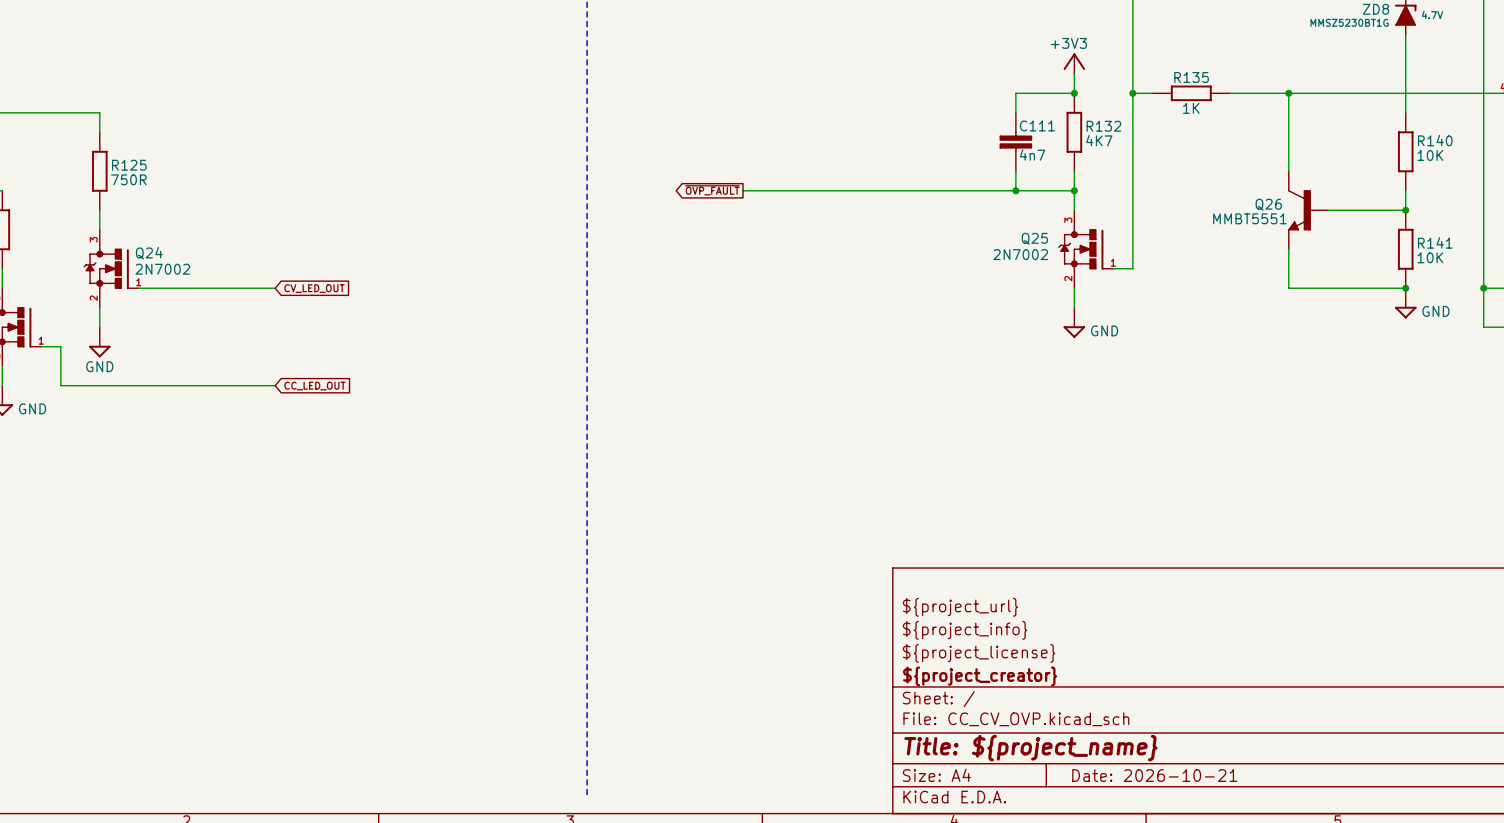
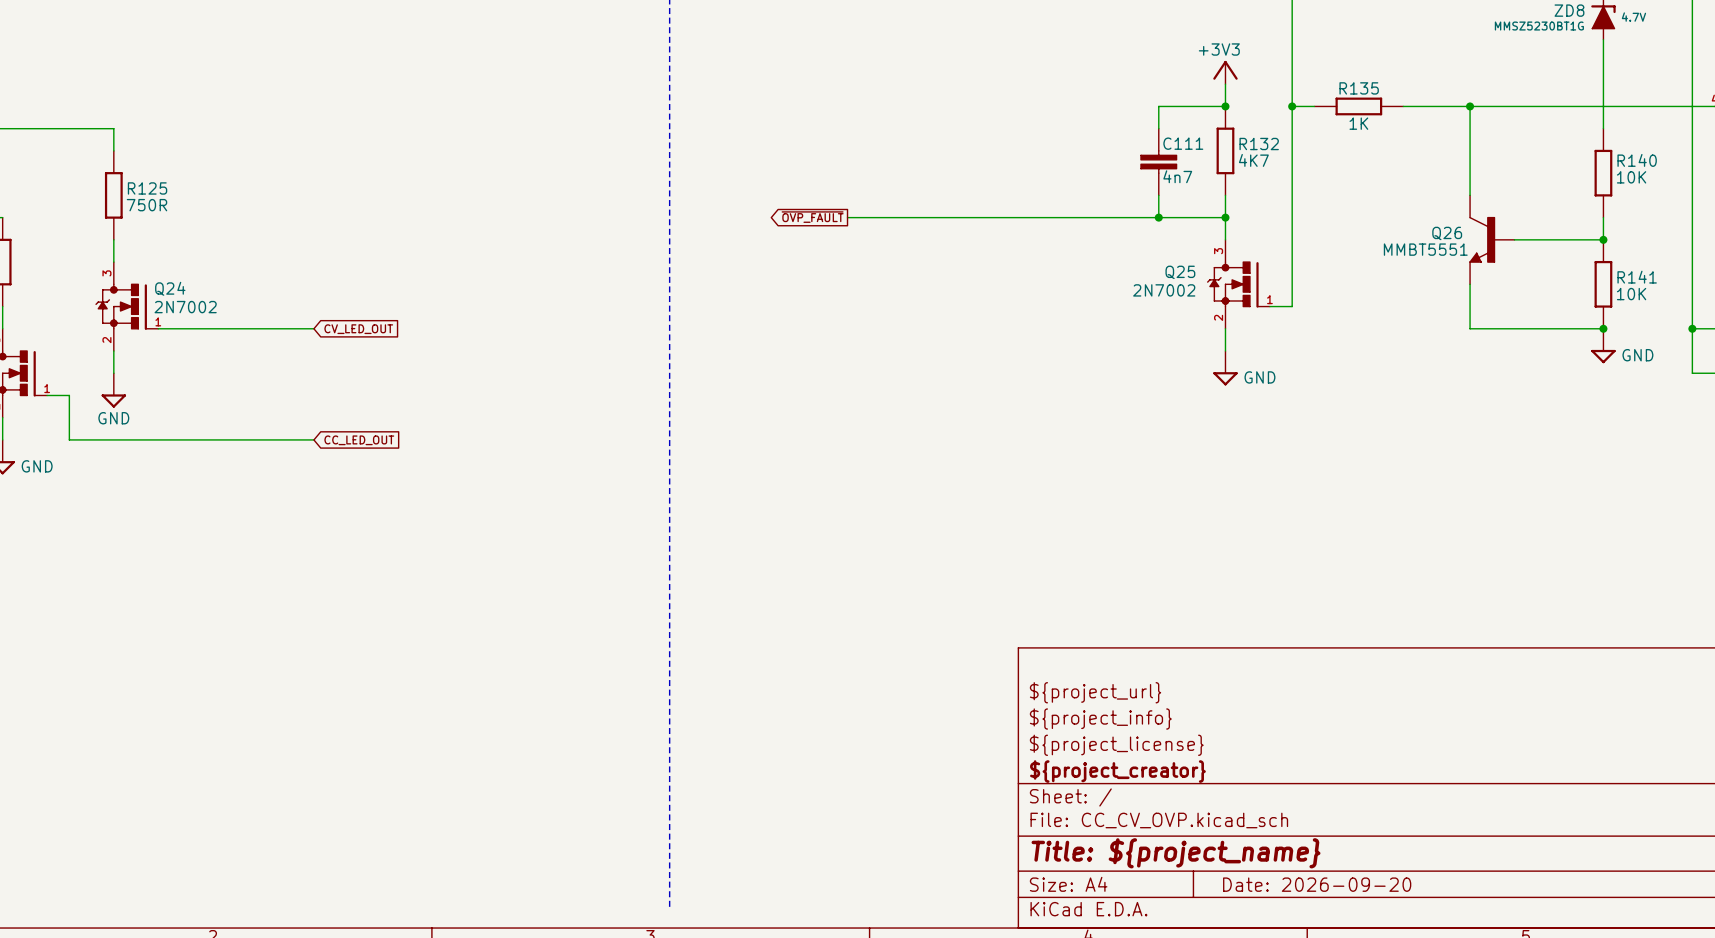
title block: Date: 2026-10-21 (1154, 775) -> Date: 2026-09-20 (1317, 884)

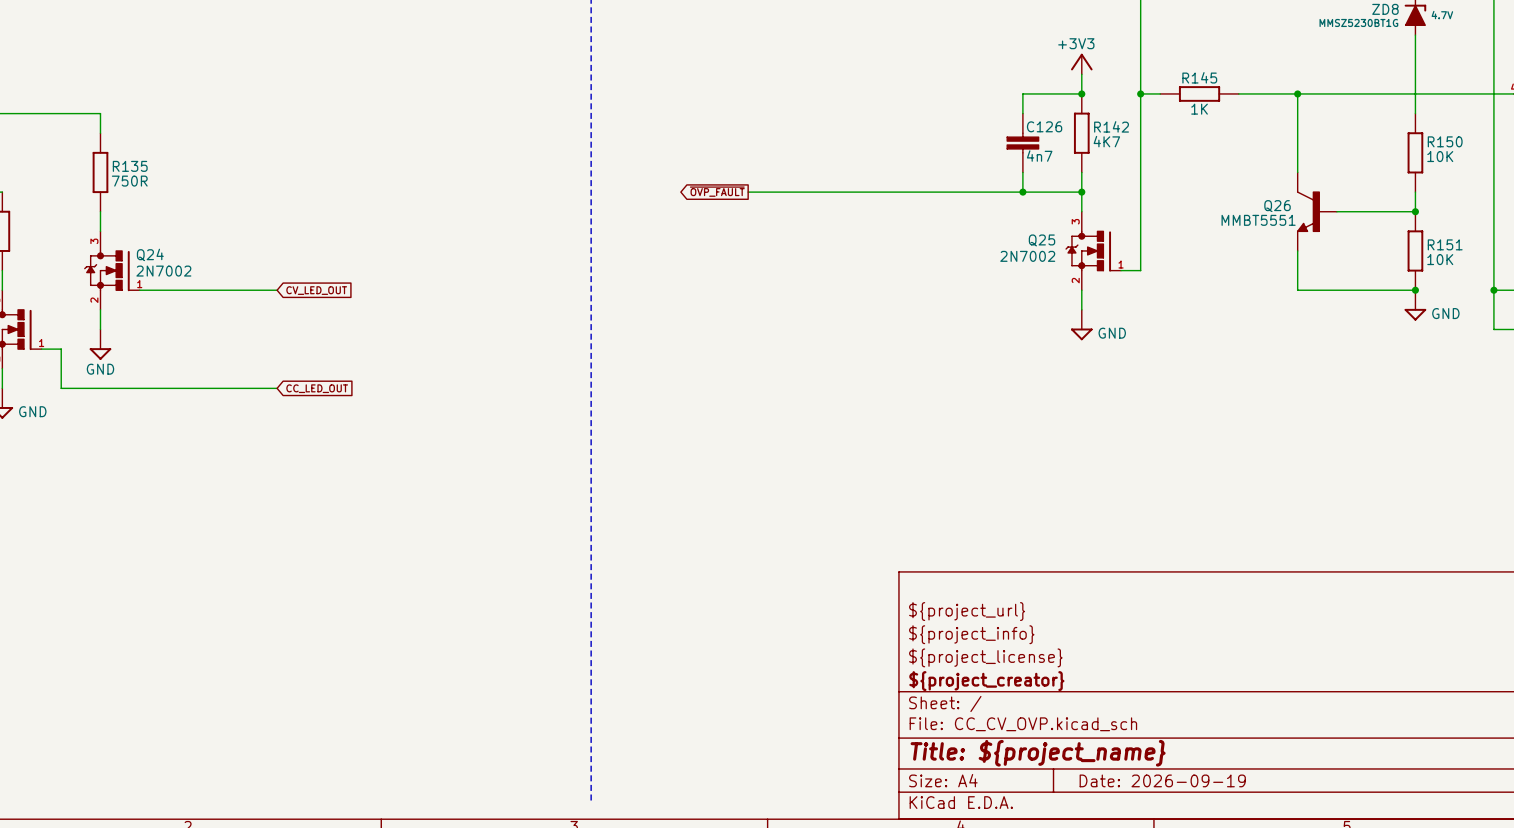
R135 name: R135 (1359, 88) -> R145 (1199, 77)
C111 name: C111 (1183, 143) -> C126 (1044, 126)
R132 name: R132 (1259, 144) -> R142 (1111, 126)
R140 name: R140 (1637, 160) -> R150 (1445, 141)
R125 name: R125 (147, 188) -> R135 (130, 166)
R141 name: R141 (1637, 277) -> R151 (1445, 244)
title block: Date: 2026-09-20 (1317, 884) -> Date: 2026-09-19 (1162, 780)

